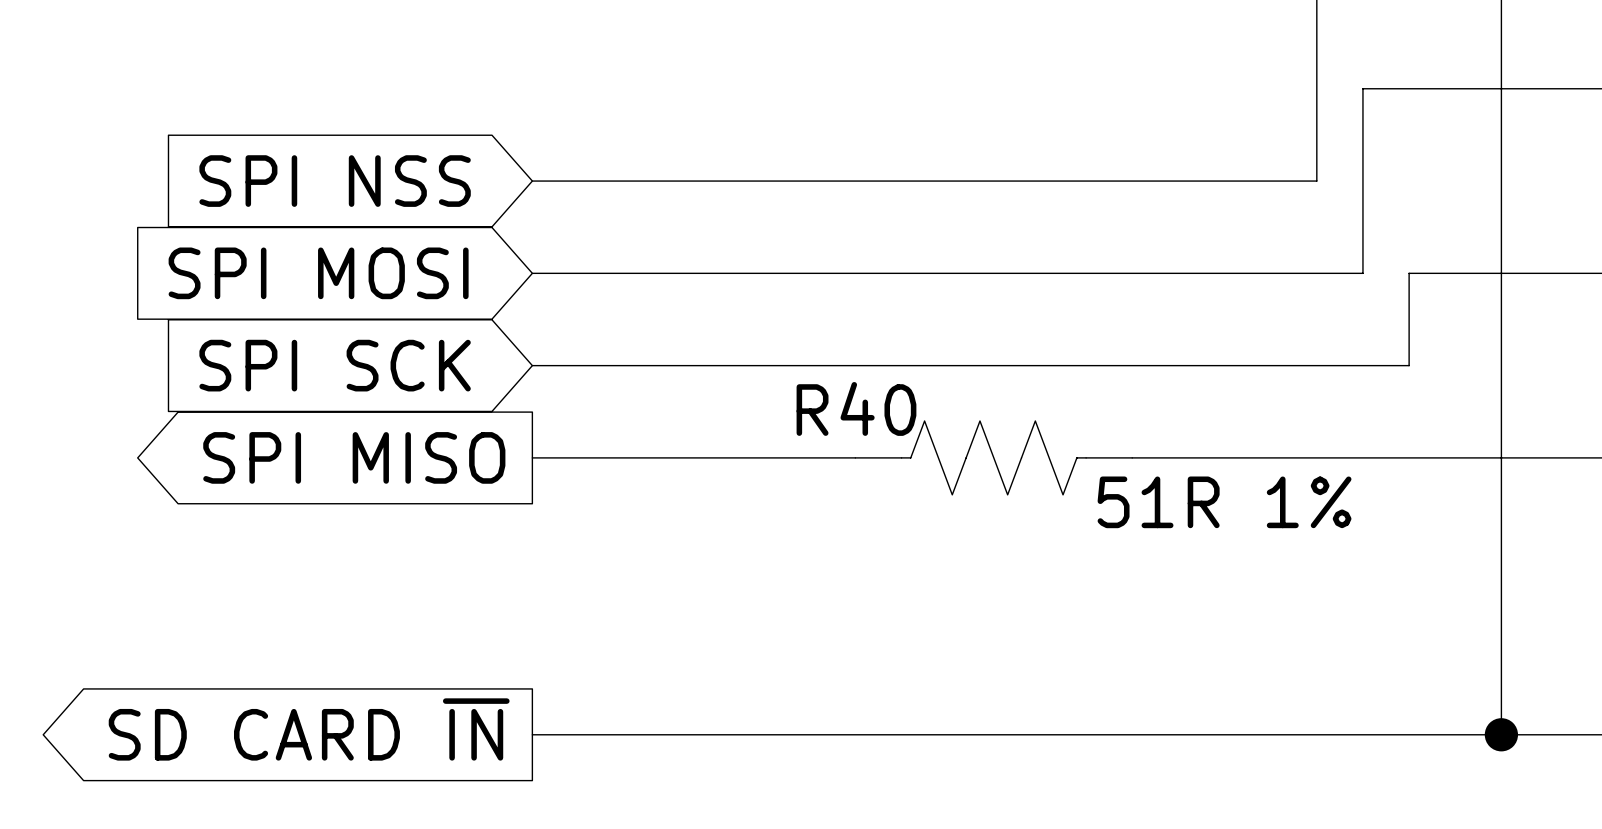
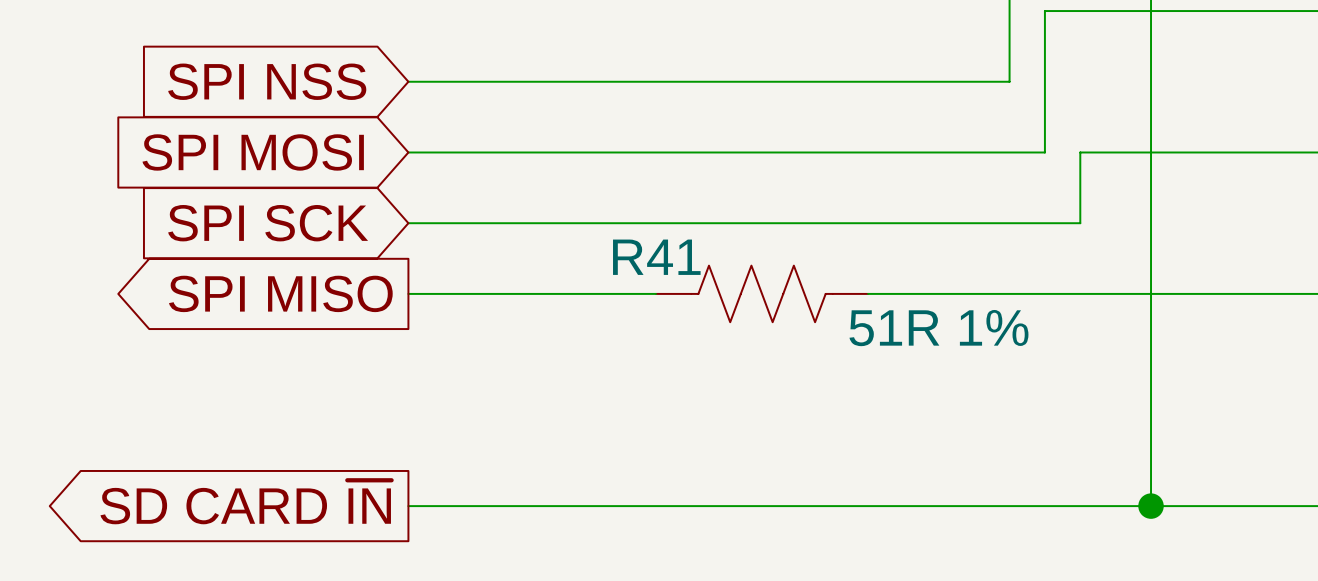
R40 name: R40 (856, 408) -> R41 (656, 257)

